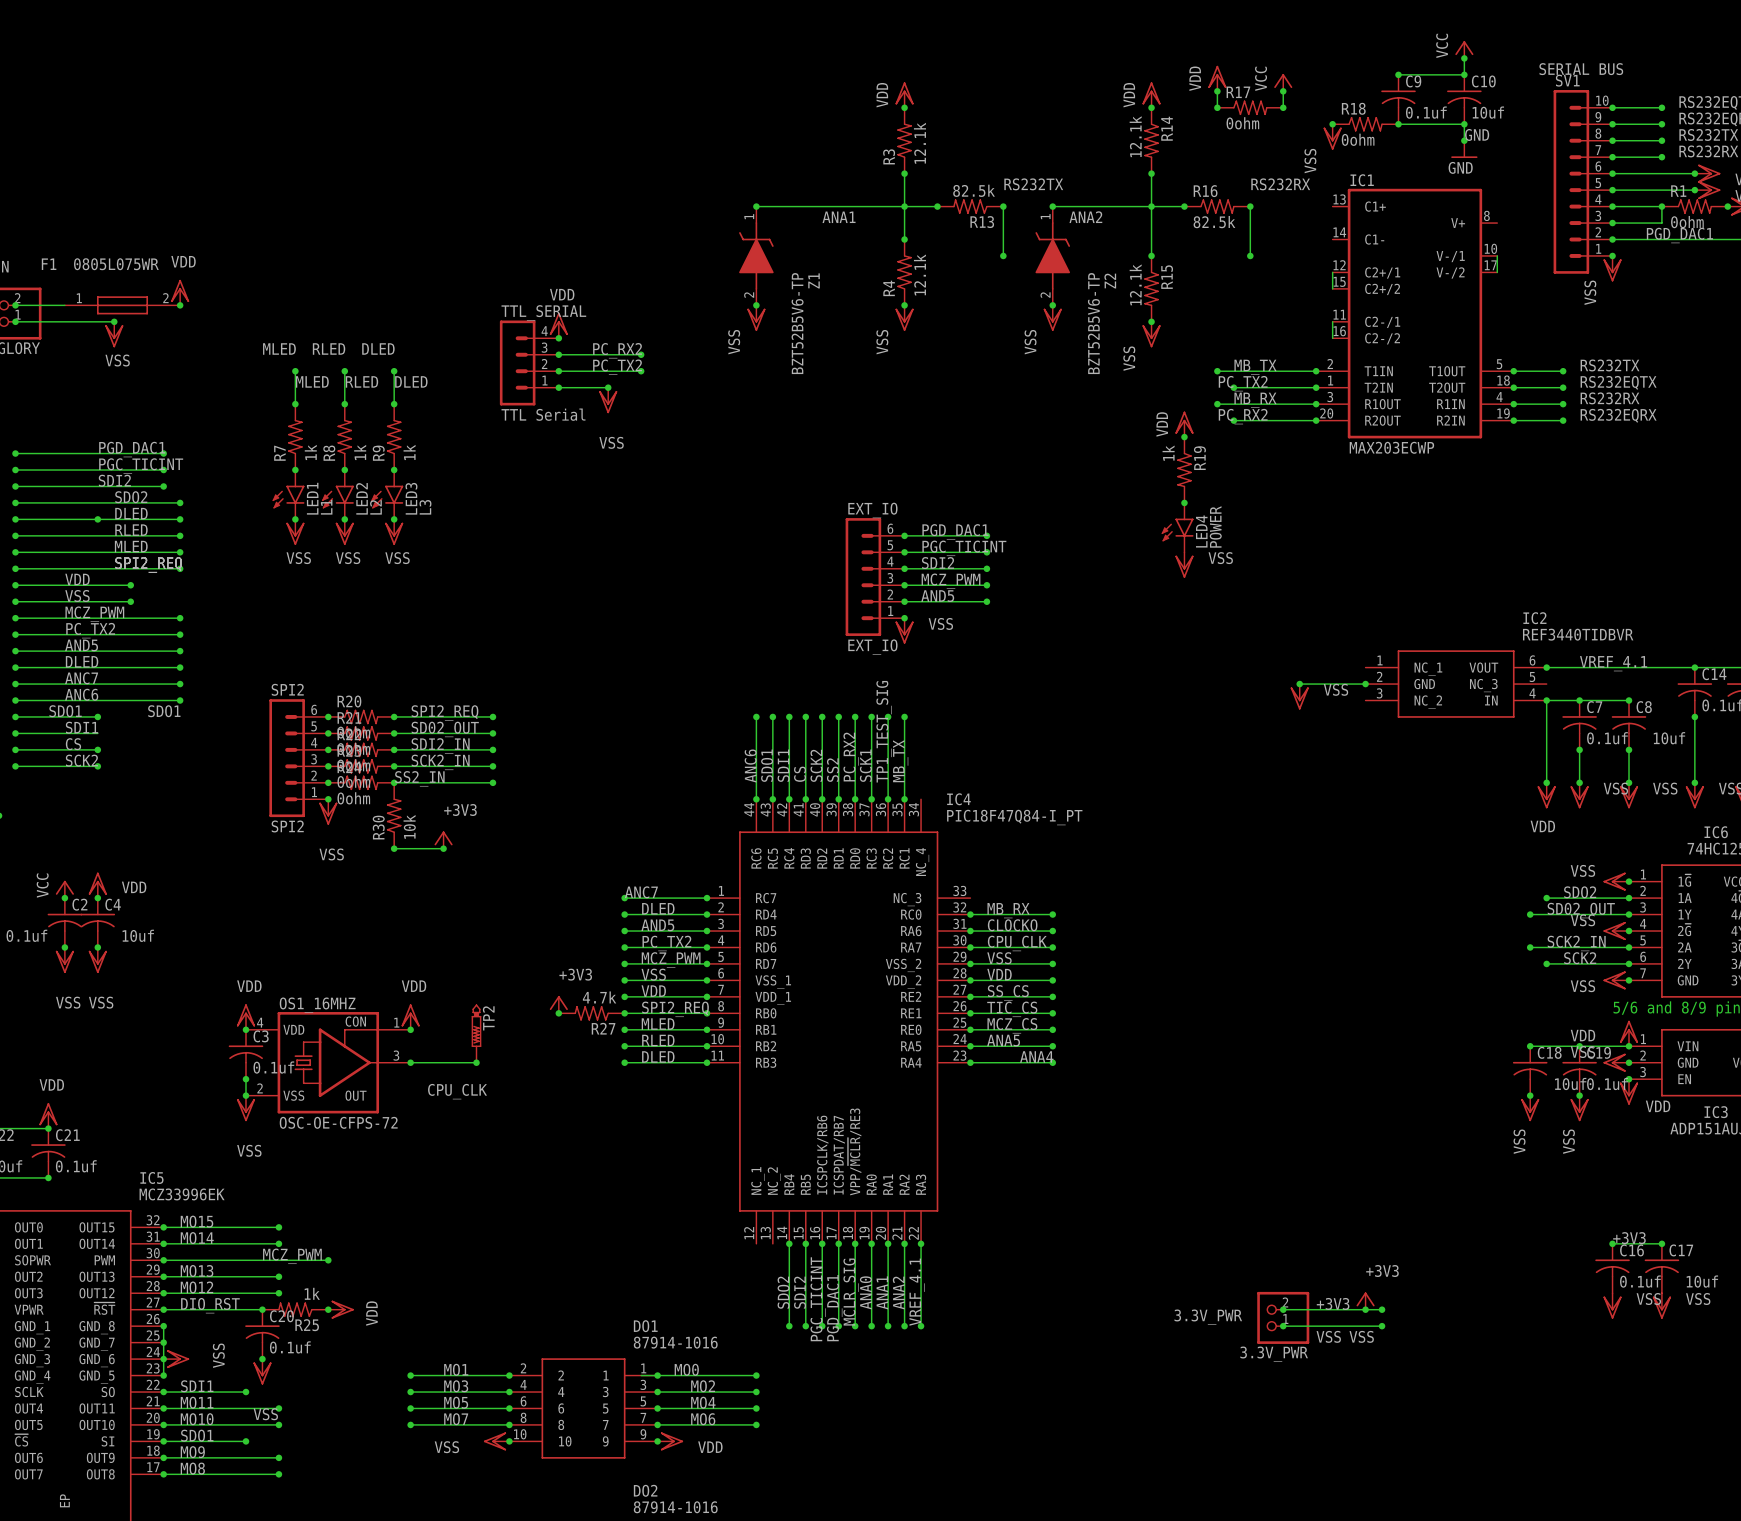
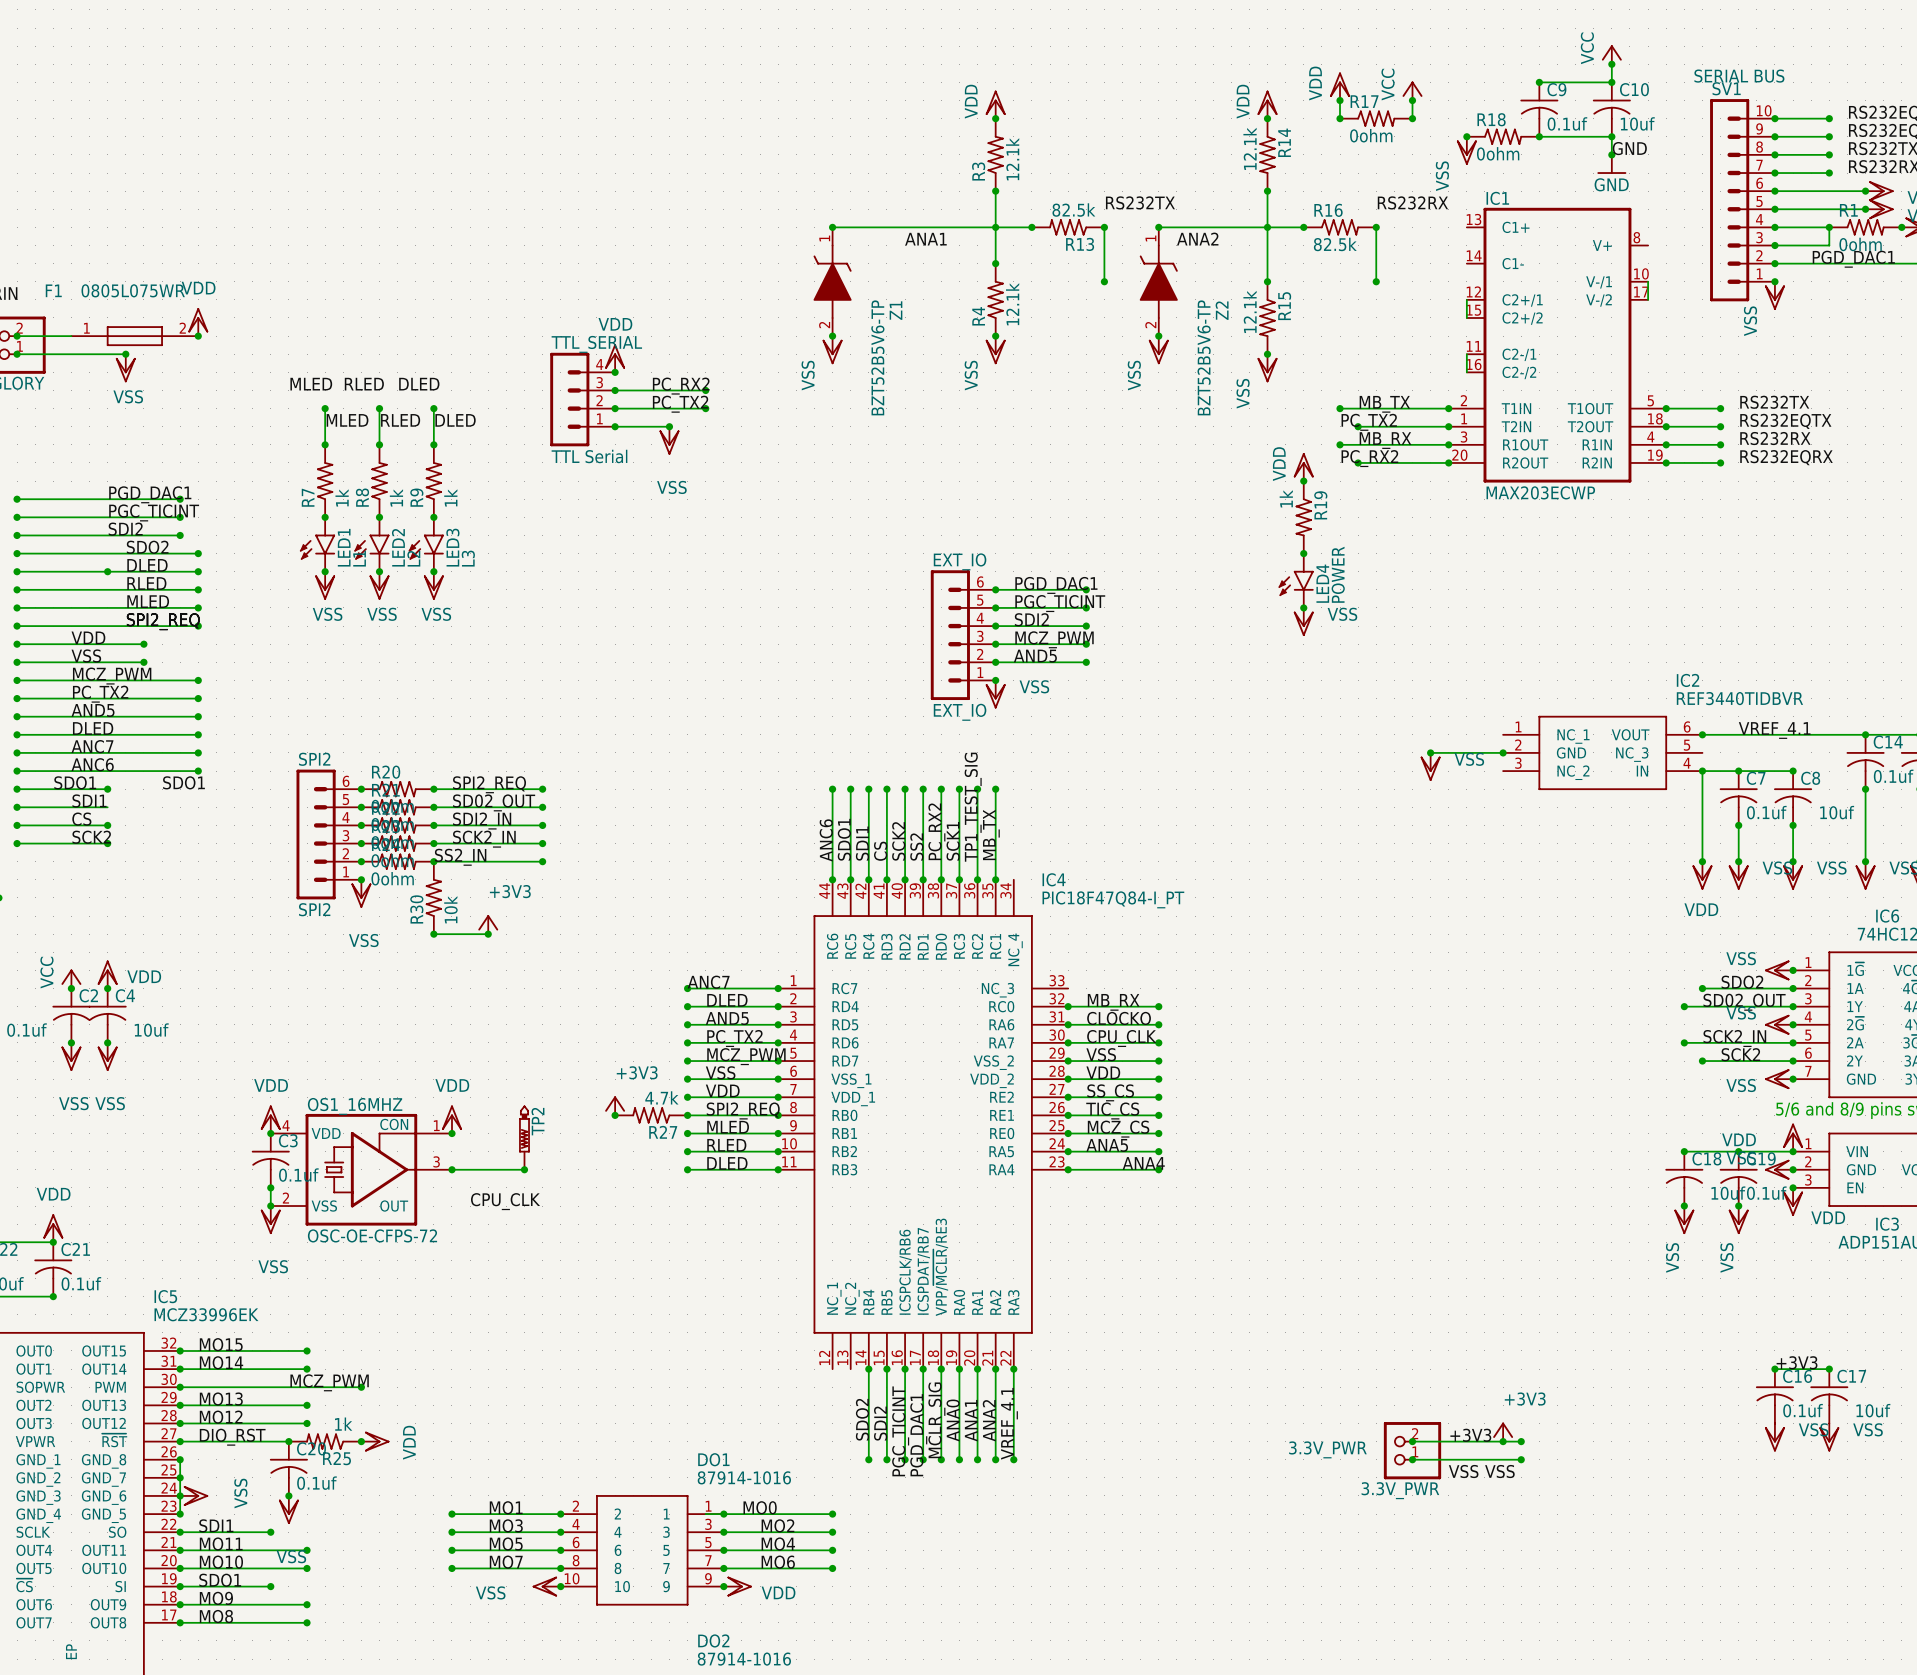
junction: none -> (1303, 607)

